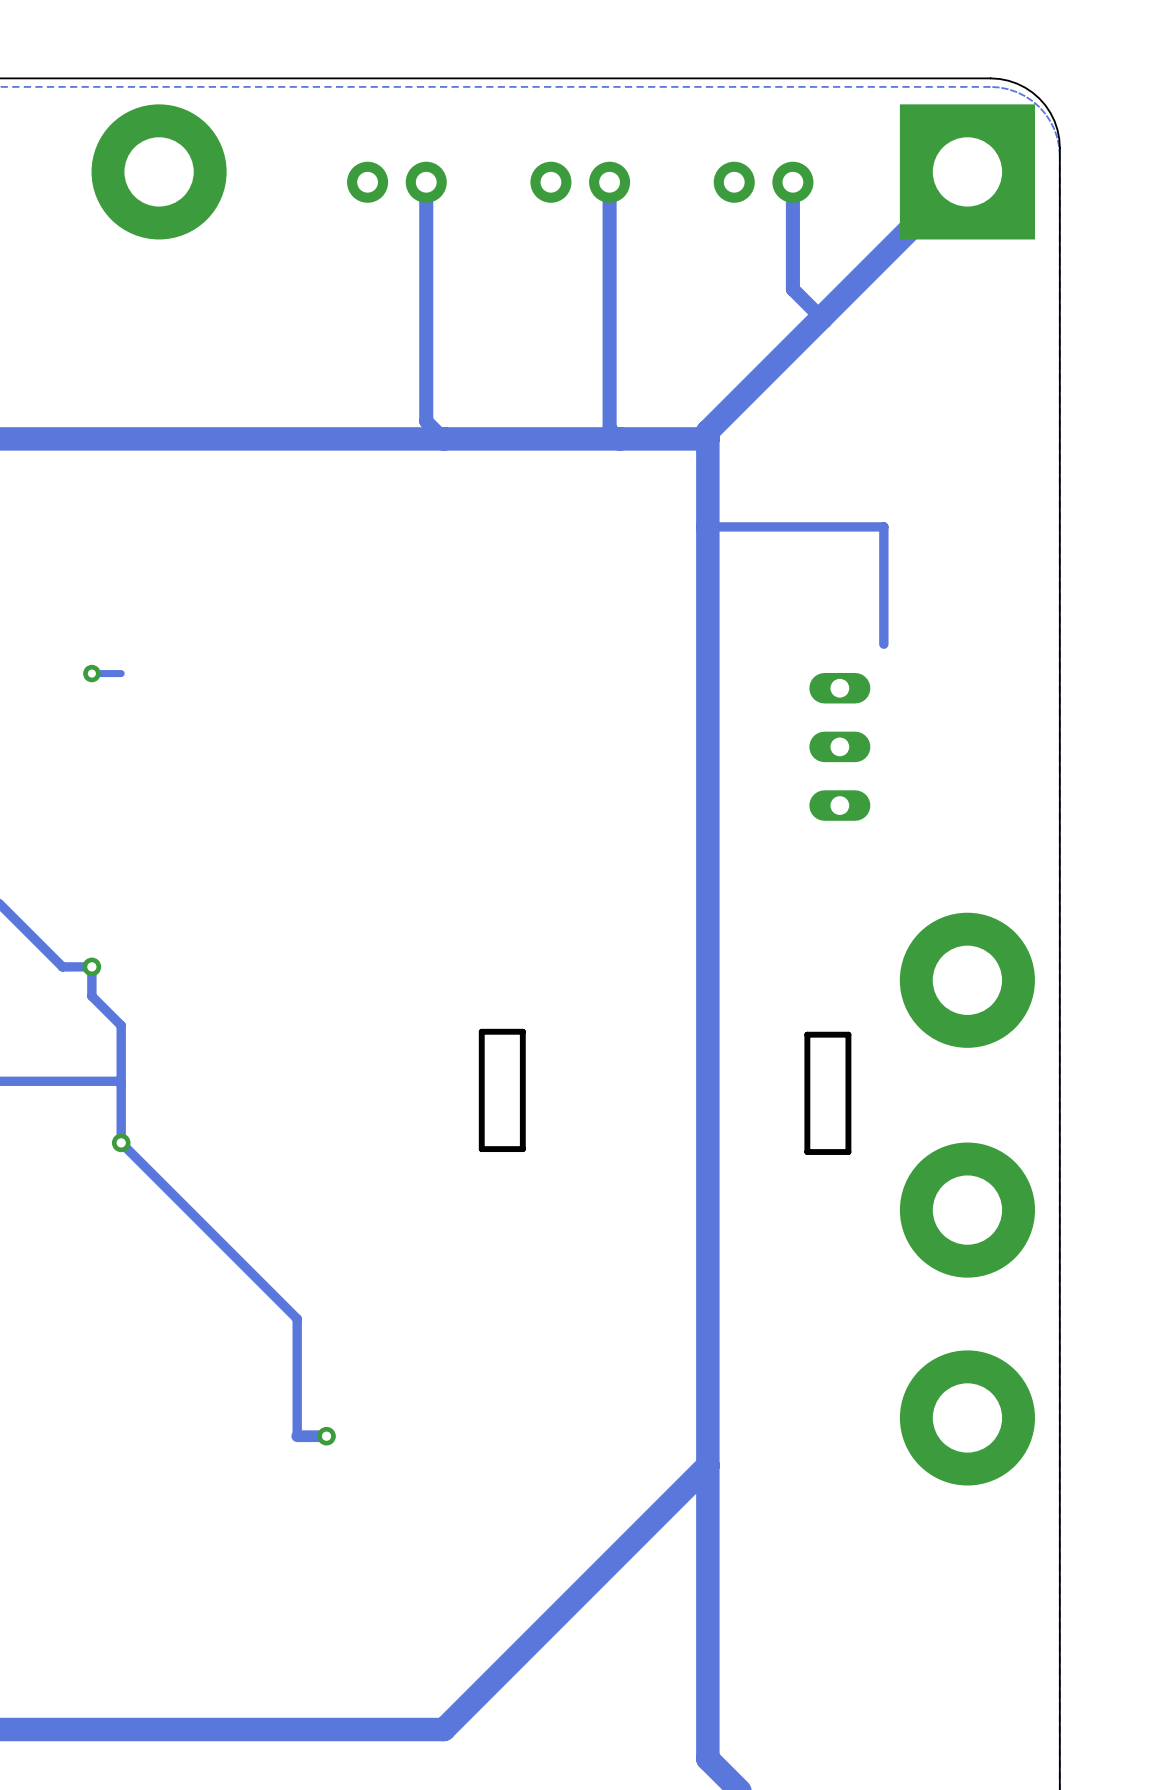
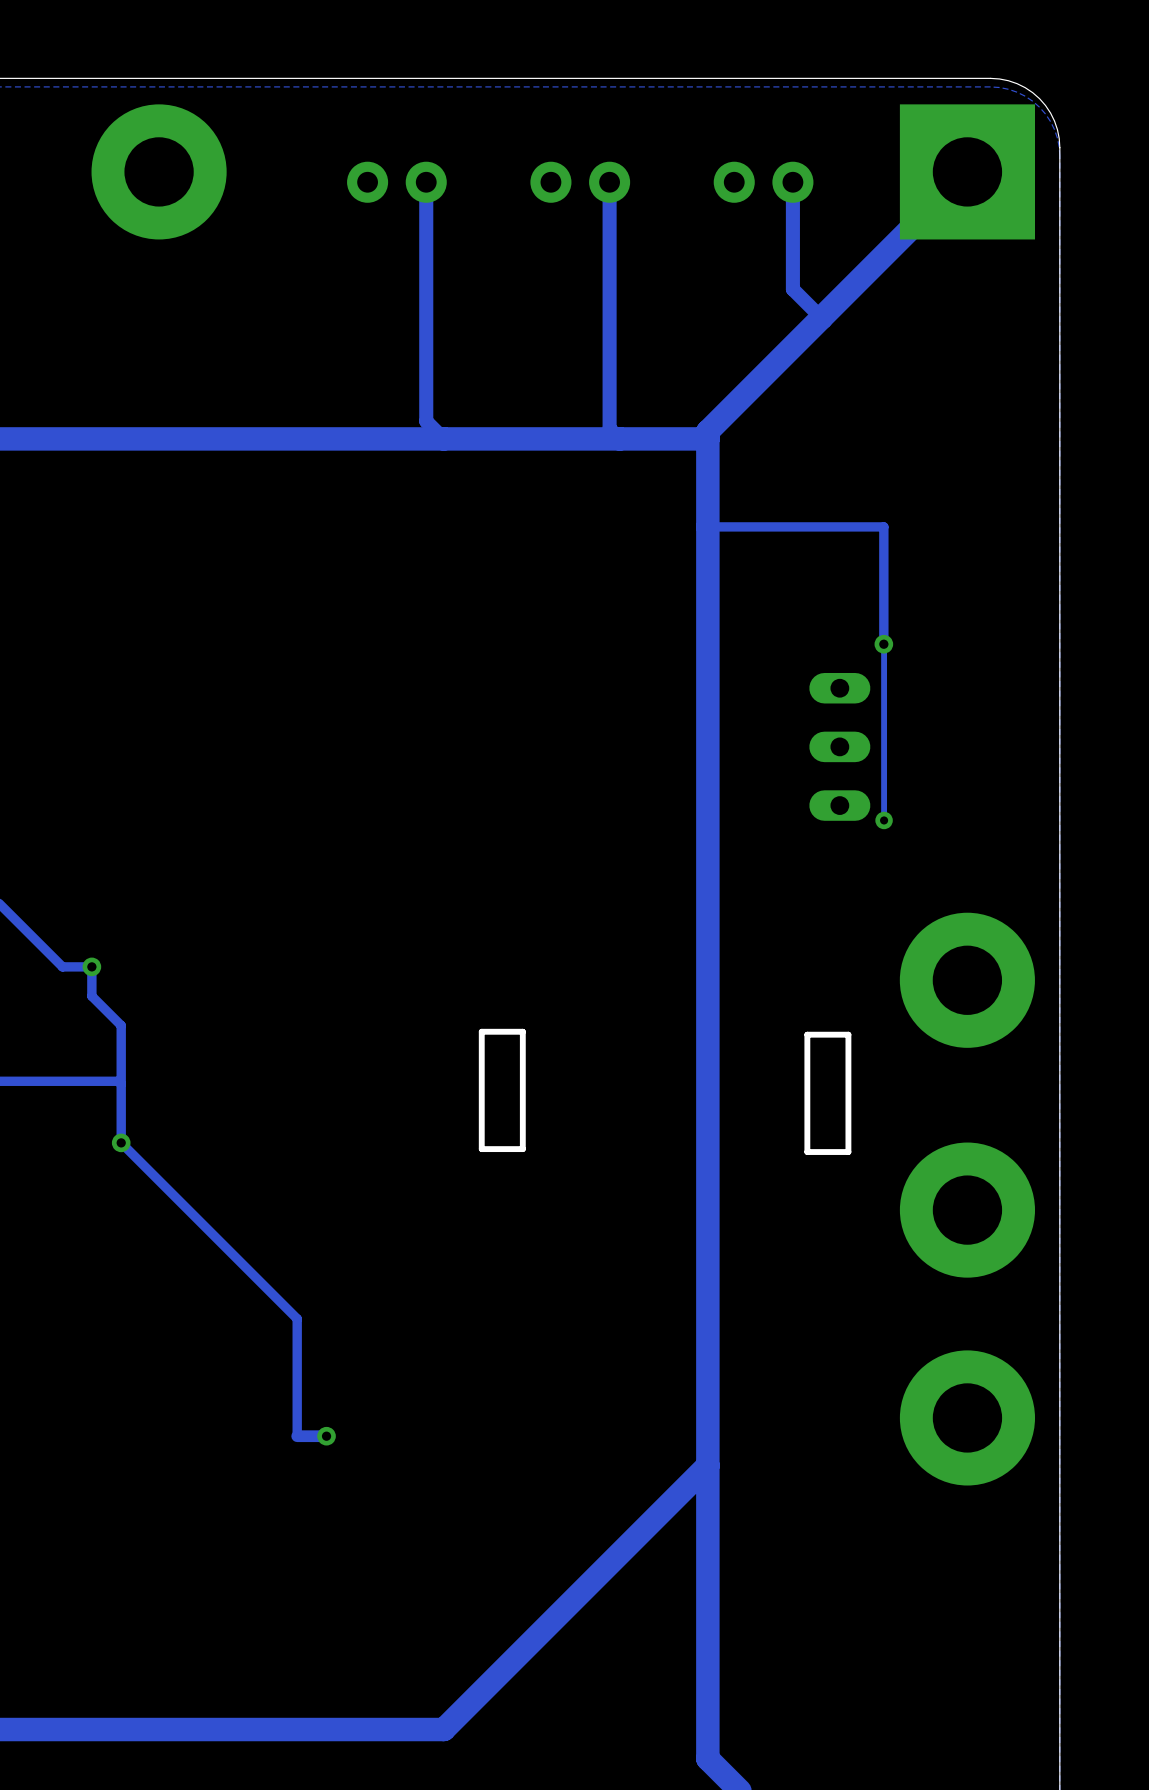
via: none -> (883, 644)
track: none -> (884, 644) (884, 820)
via: (91, 673) -> none
track: (121, 673) (91, 673) -> none
via: none -> (884, 820)

